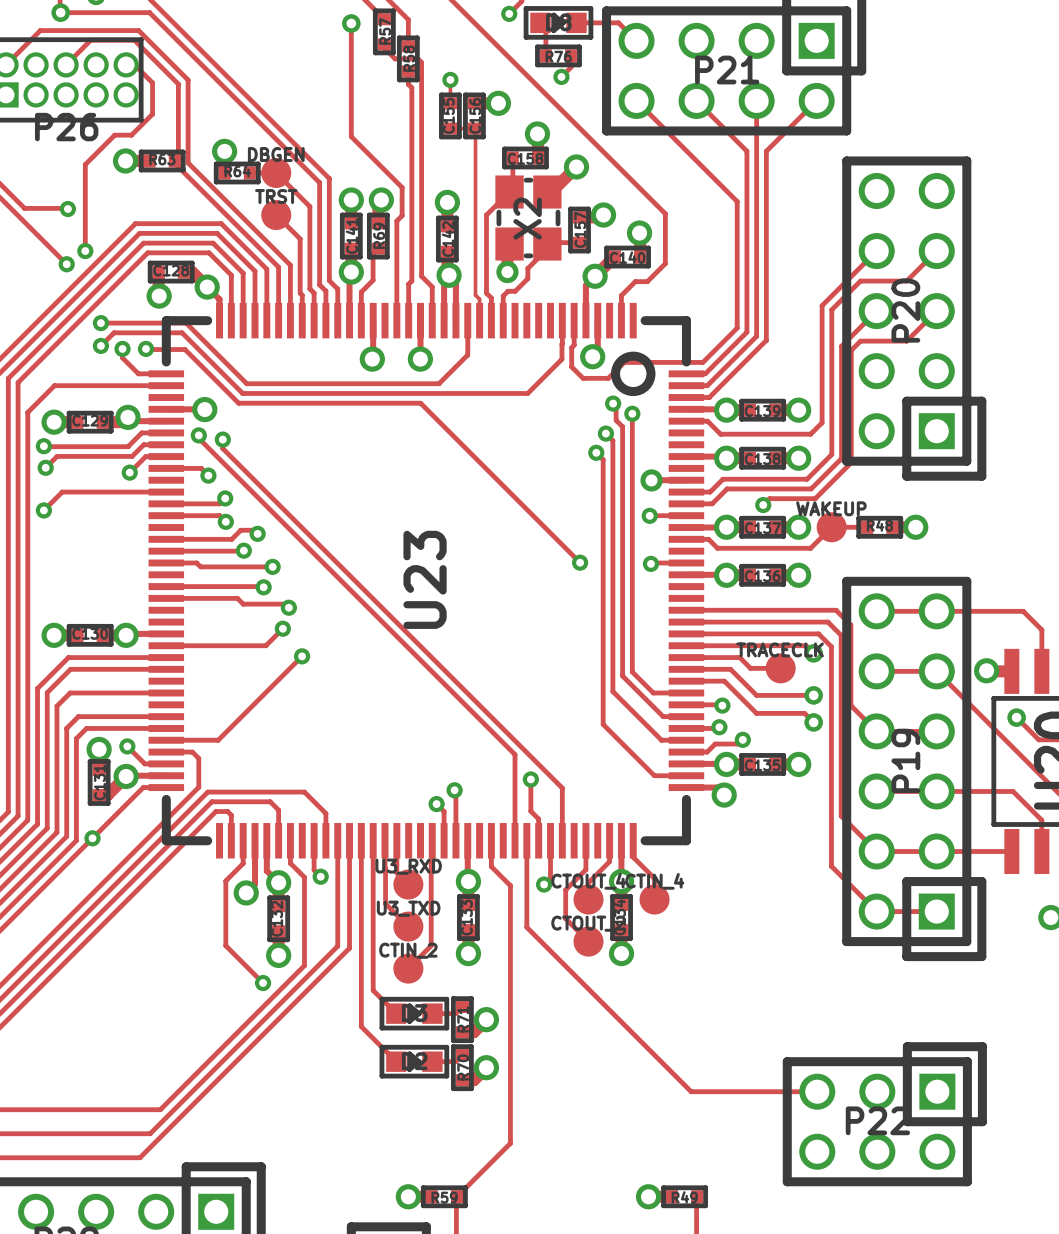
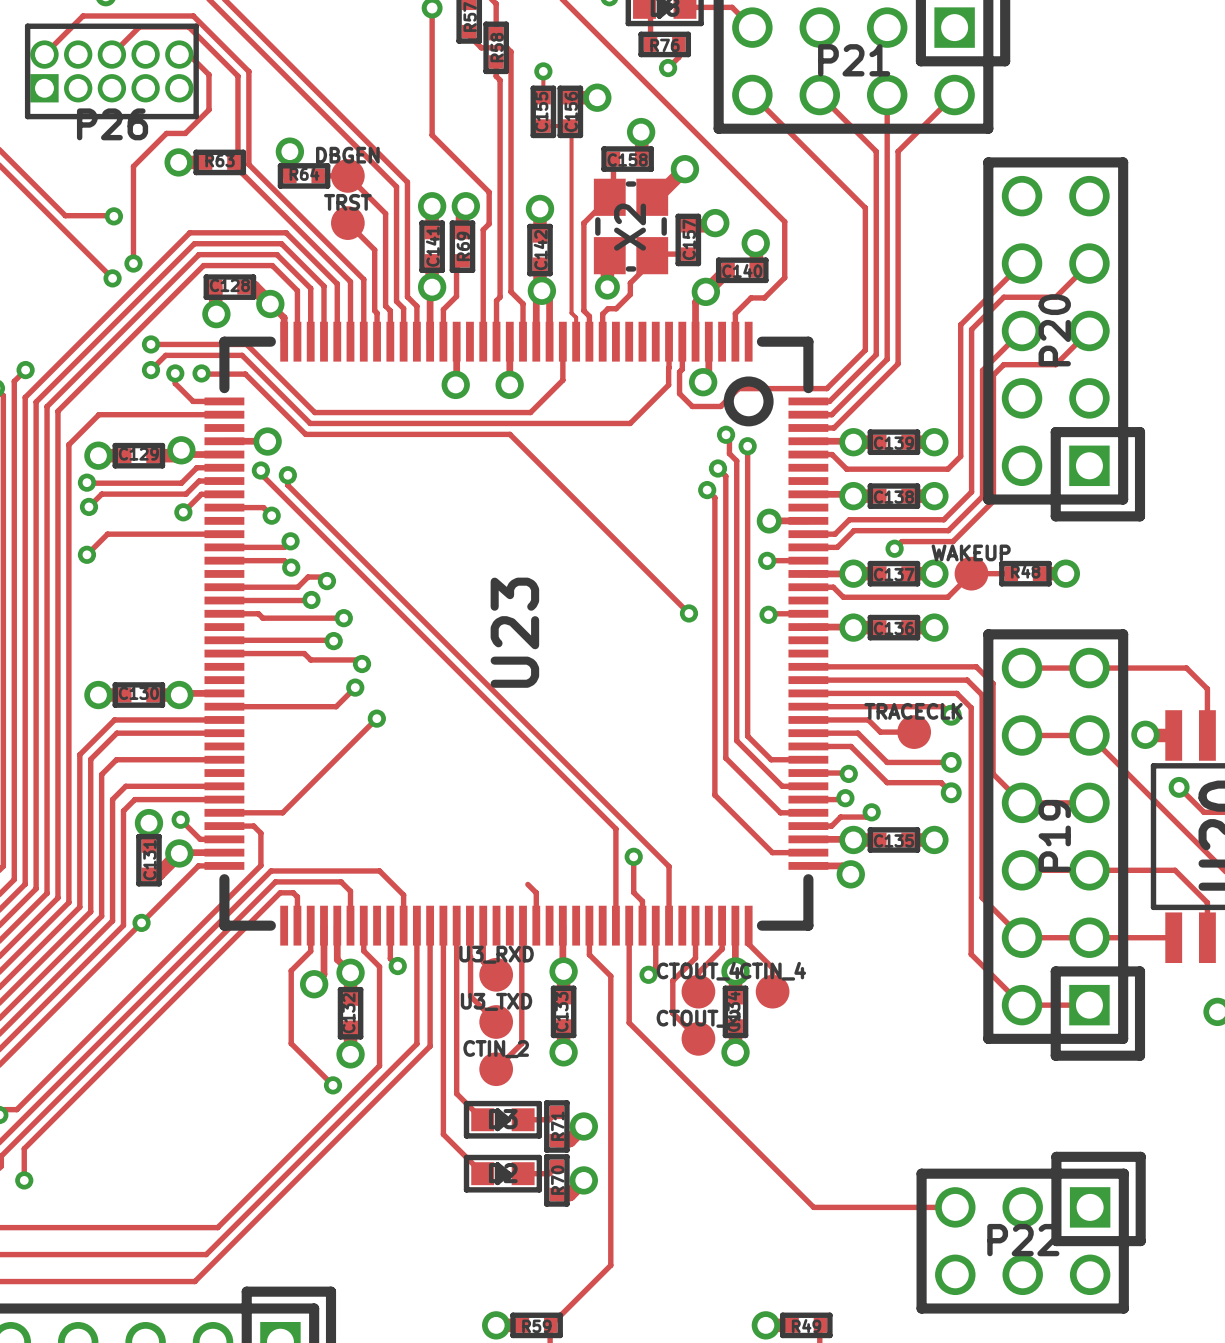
track: (454, 790) (455, 840) -> none
via: (454, 790) -> none
via: (436, 804) -> none

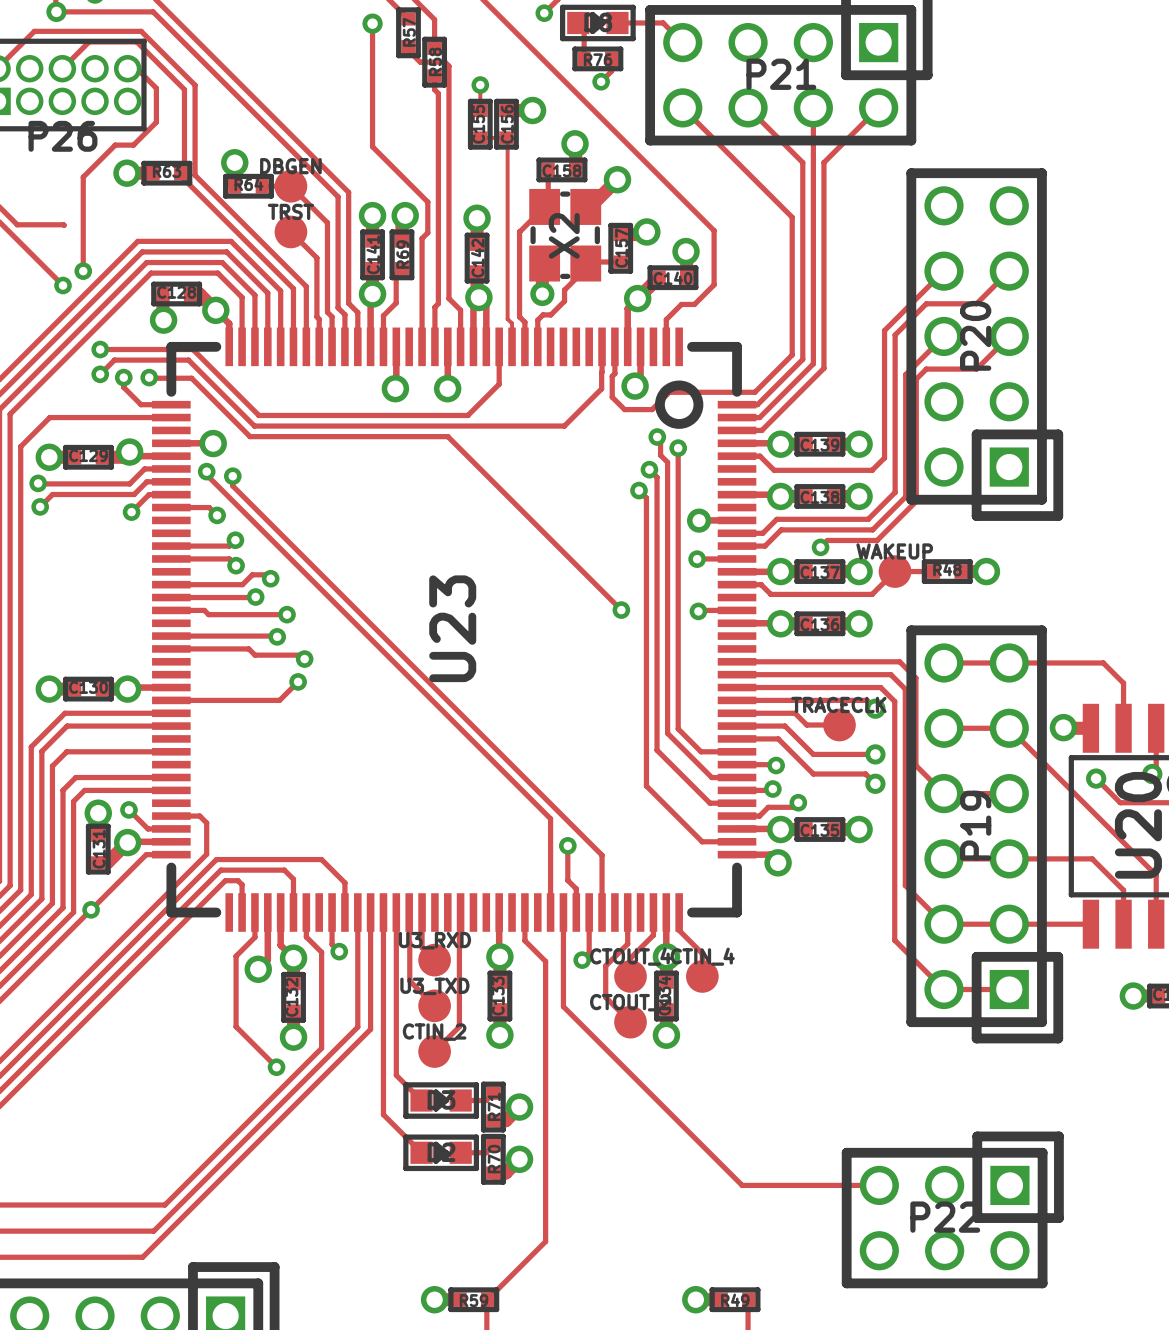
via: (113, 216) -> none
track: (224, 534) (107, 534) (86, 554) -> none
via: (86, 554) -> none
track: (376, 718) (282, 812) (224, 812) -> none
via: (376, 718) -> none
track: (527, 884) (536, 892) (536, 925) -> none

